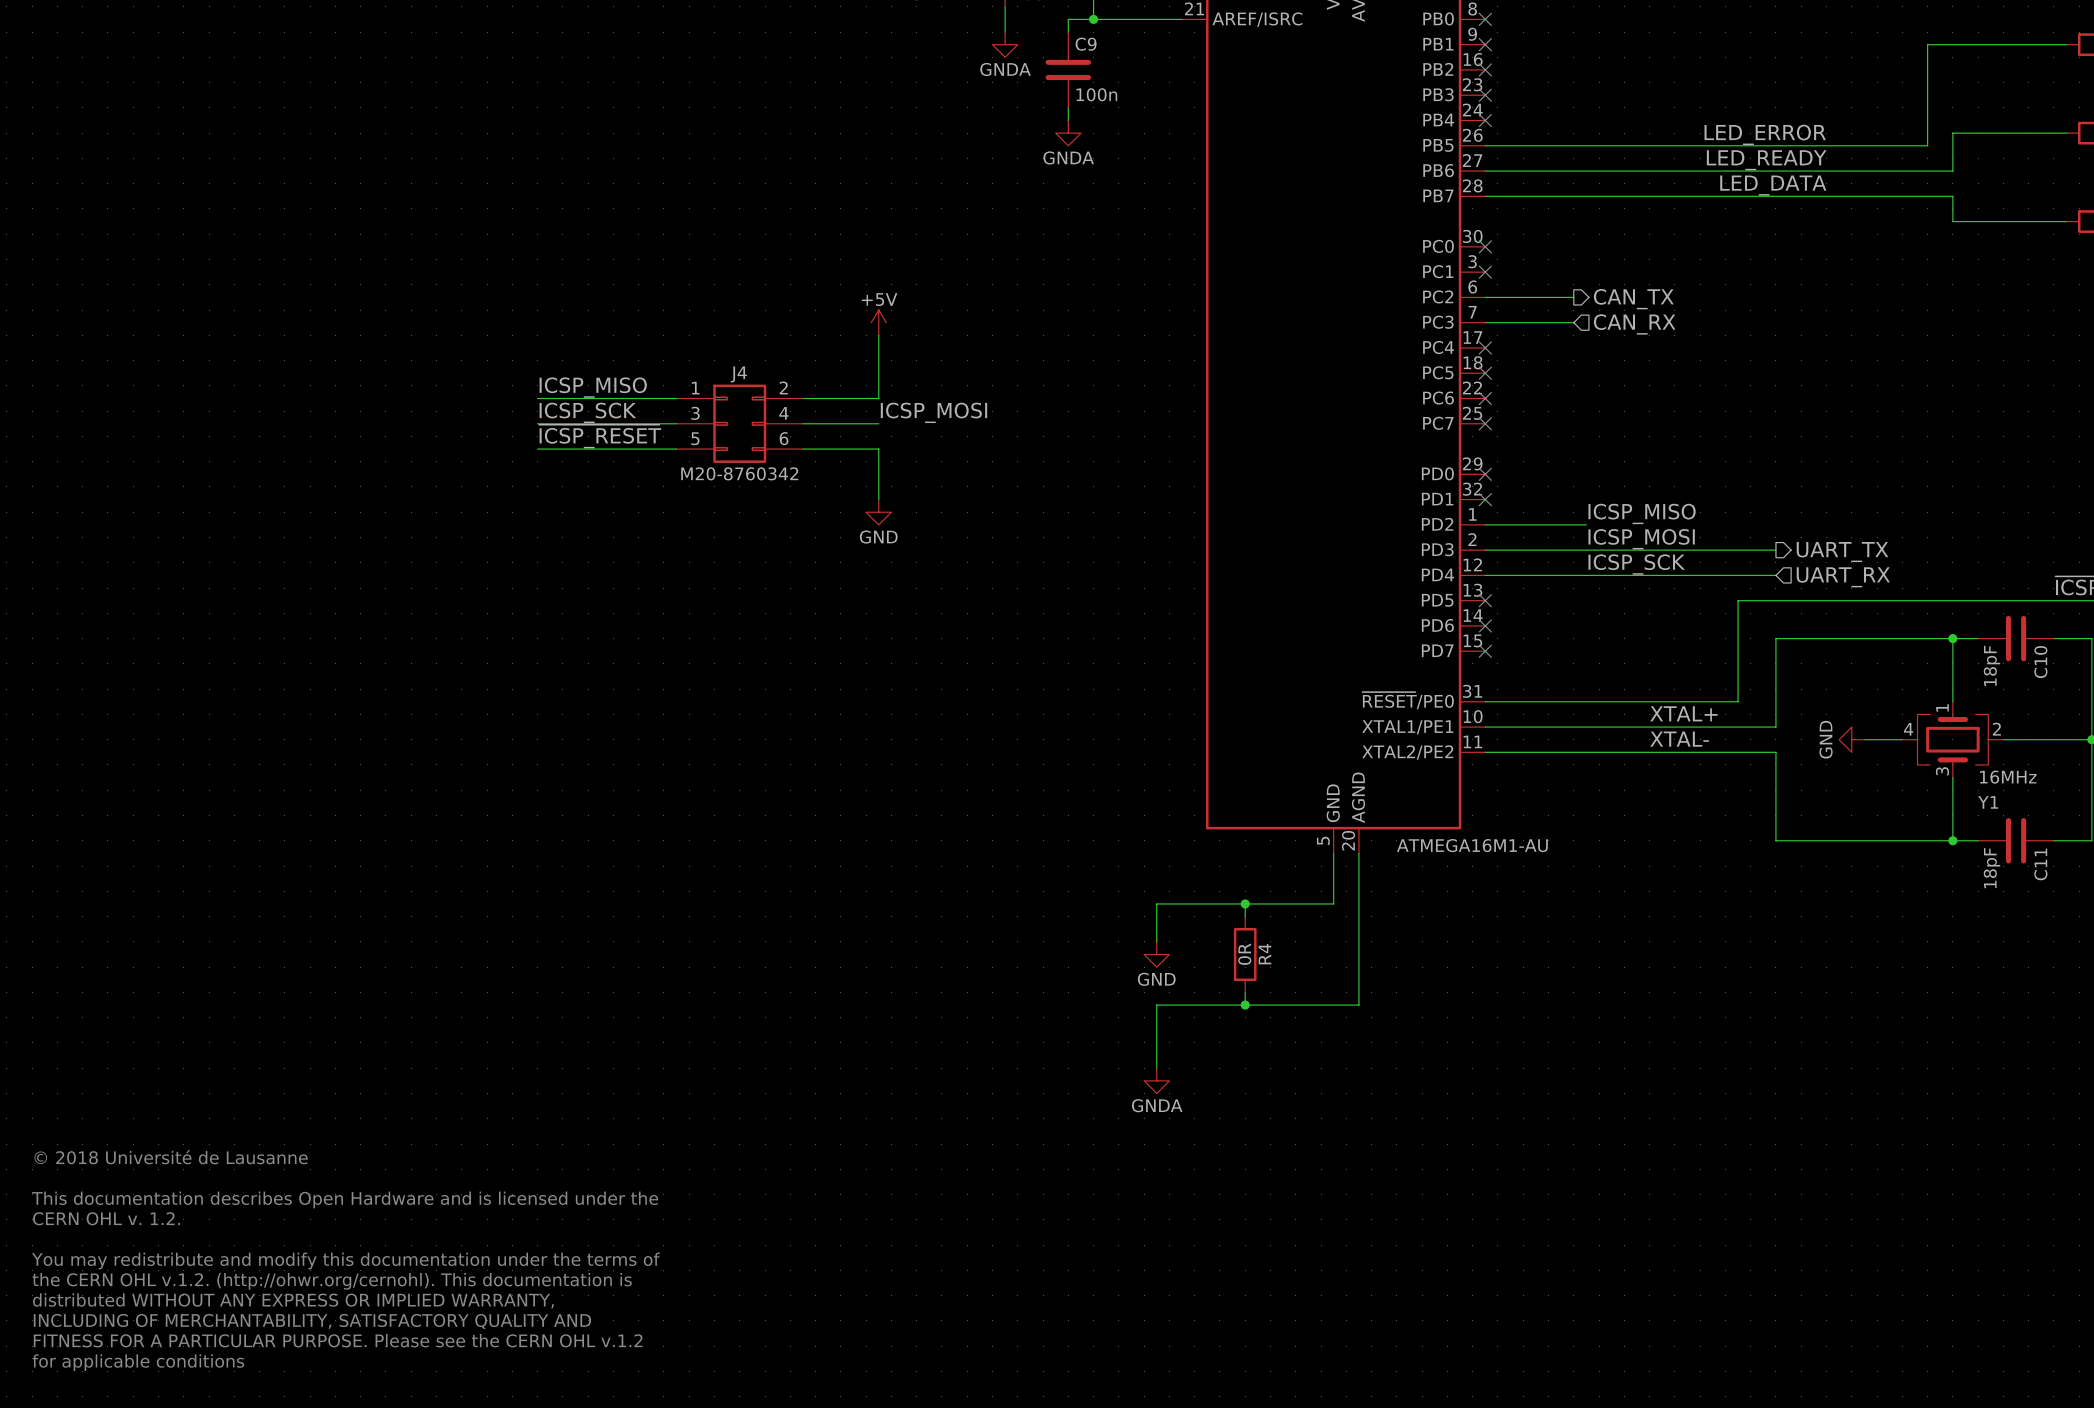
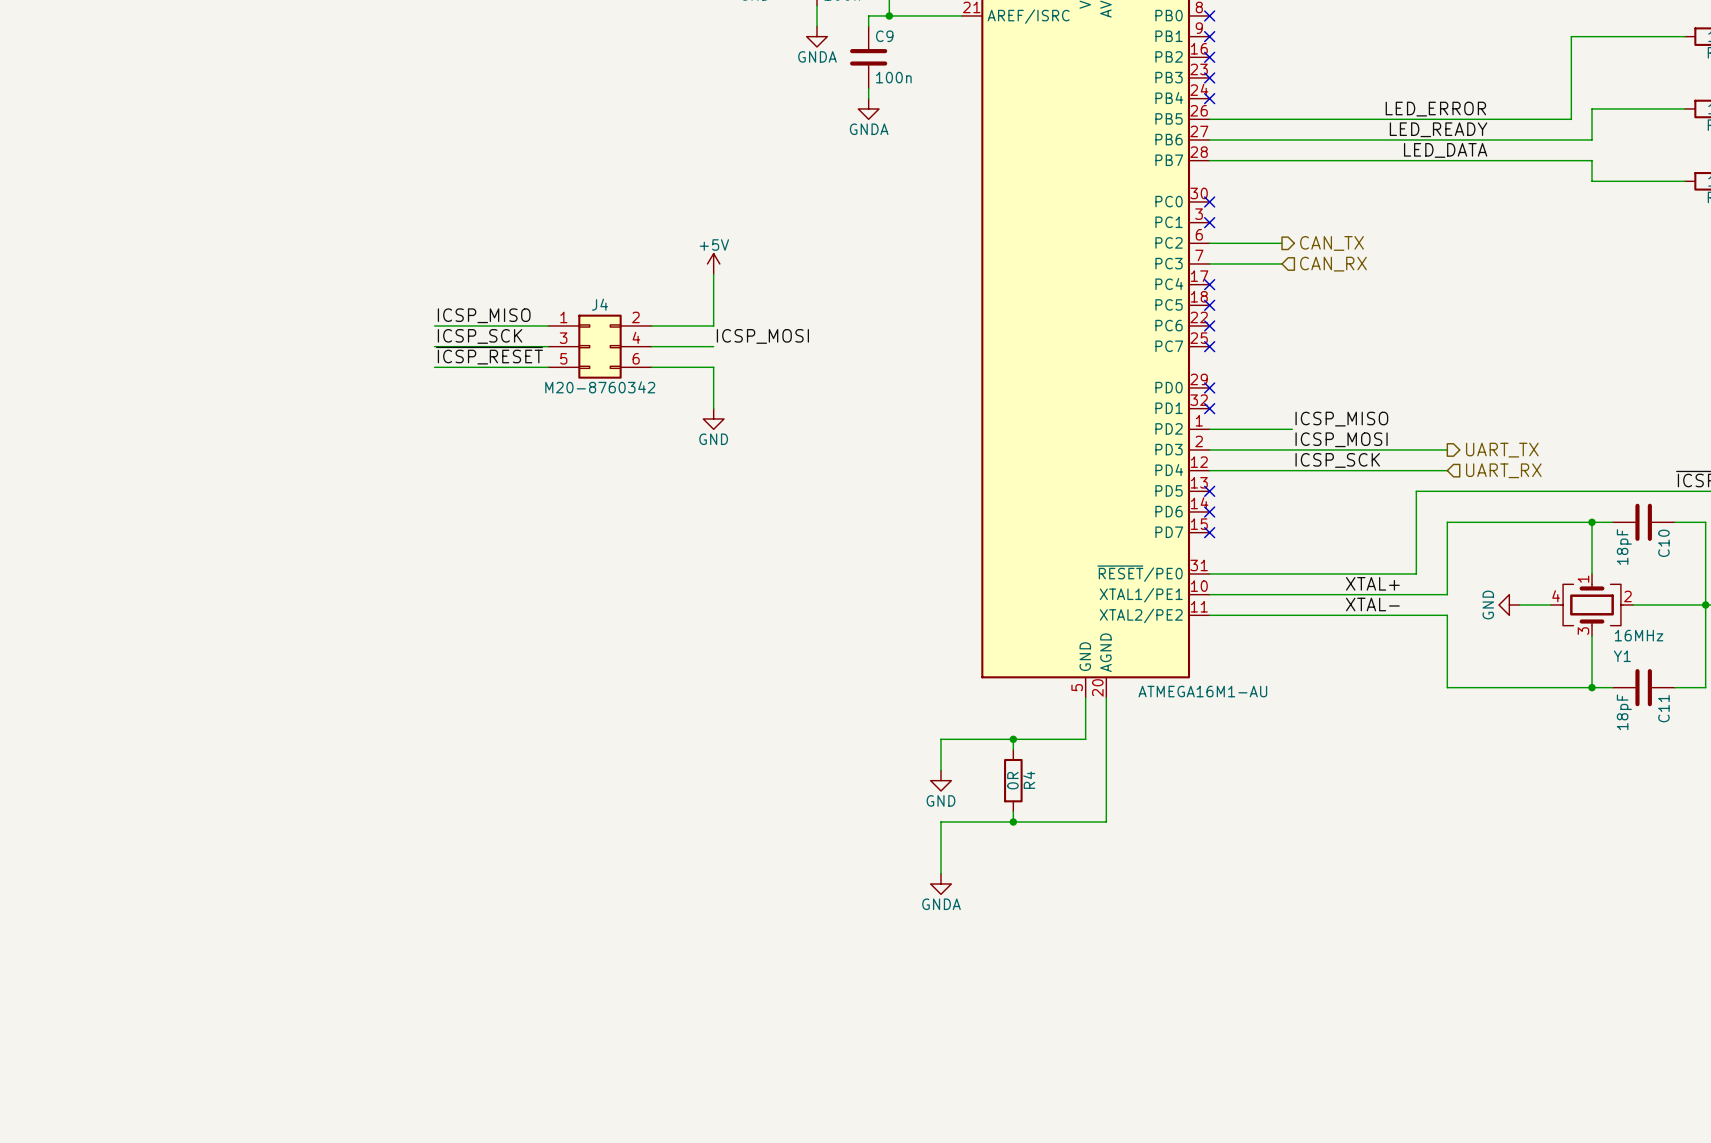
text: © 2018 Université de Lausanne (171, 1157) -> none
text: This documentation describes Open Hardware and is licensed under the (345, 1199) -> none
text: CERN OHL v. 1.2. (106, 1218) -> none
text: You may redistribute and modify this documentation under the terms of (345, 1260) -> none
text: the CERN OHL v.1.2. (http://ohwr.org/cernohl). This documentation is (332, 1281) -> none
text: distributed WITHOUT ANY EXPRESS OR IMPLIED WARRANTY, (293, 1300) -> none
text: INCLUDING OF MERCHANTABILITY, SATISFACTORY QUALITY AND (312, 1321) -> none
text: FITNESS FOR A PARTICULAR PURPOSE. Please see the CERN OHL v.1.2 (338, 1340) -> none
text: for applicable conditions (138, 1362) -> none

